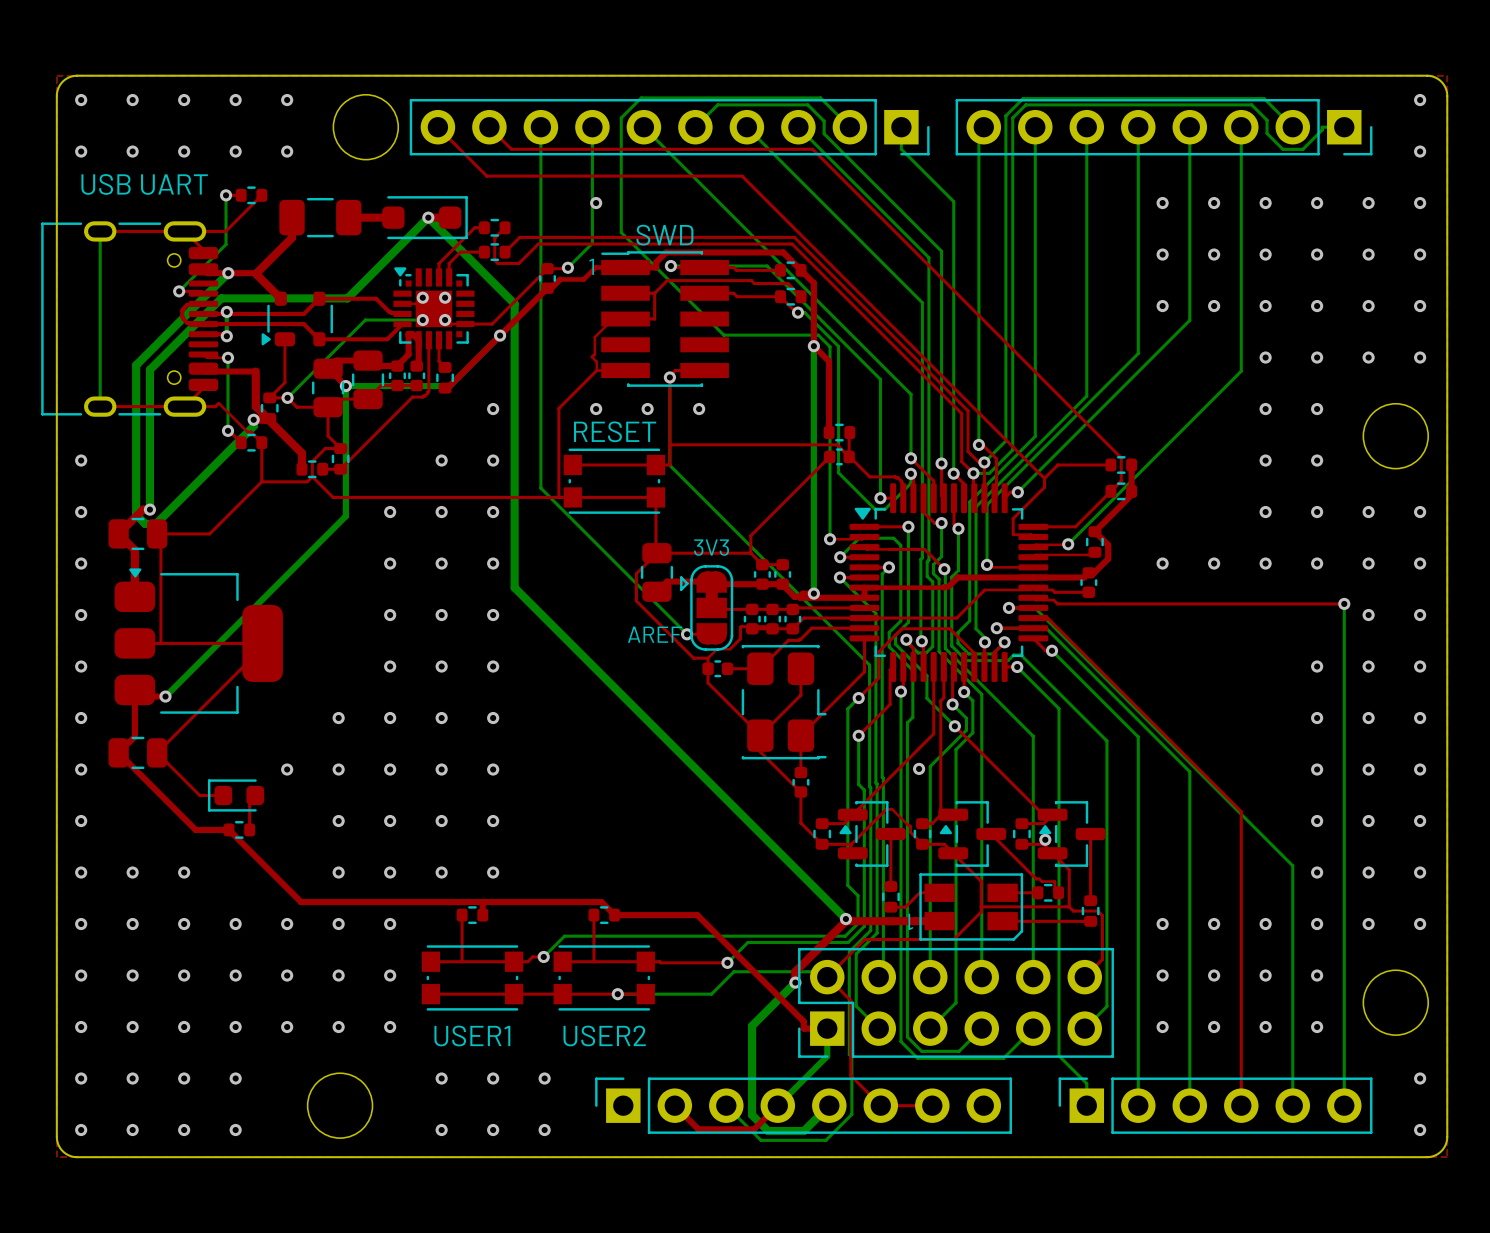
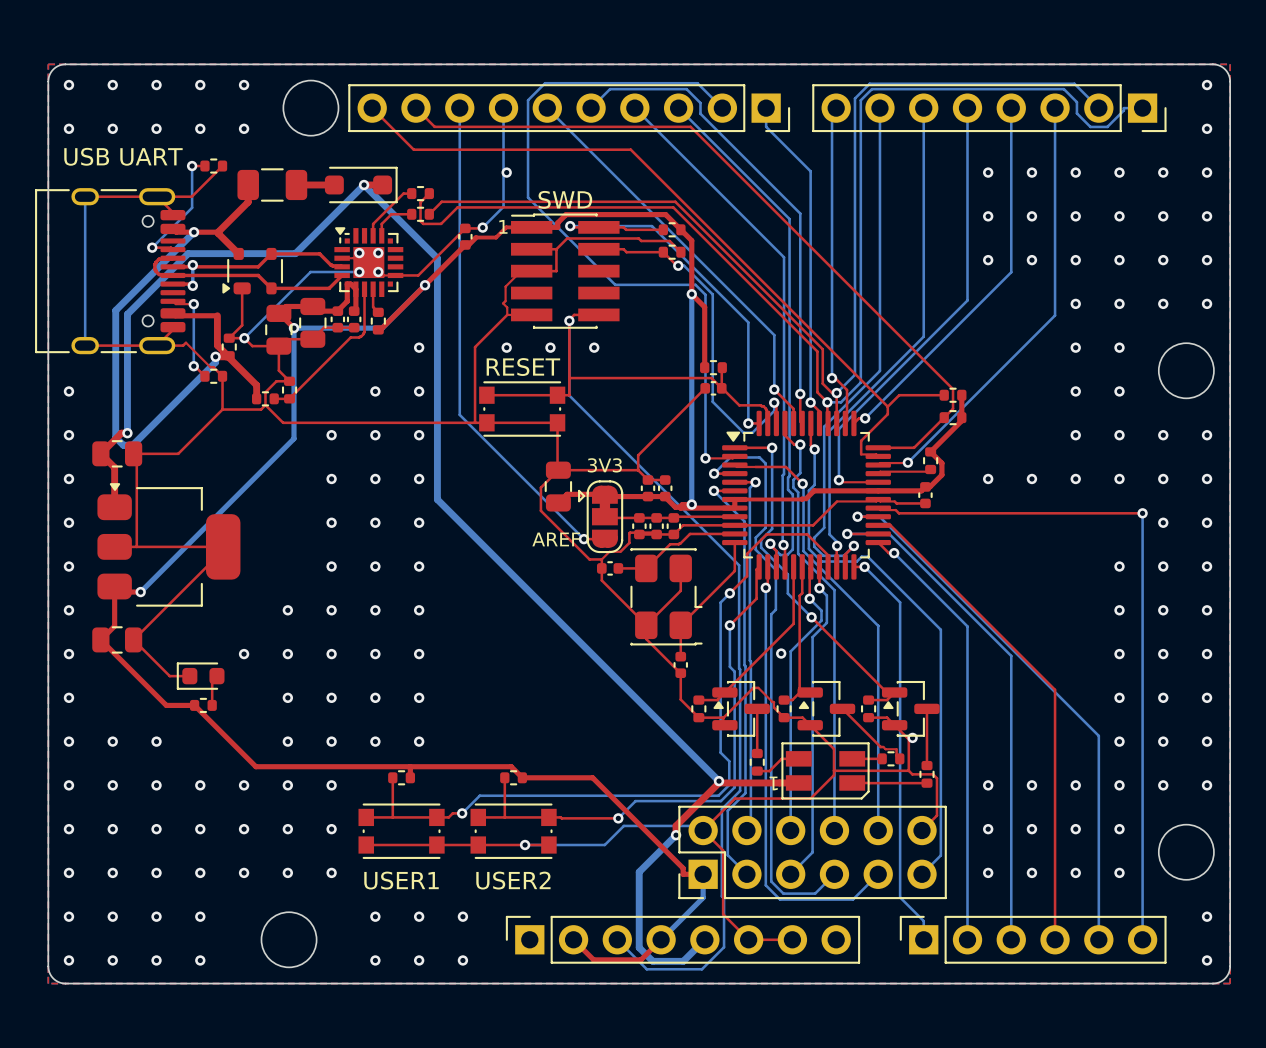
via position: (1045, 839) -> (912, 737)

